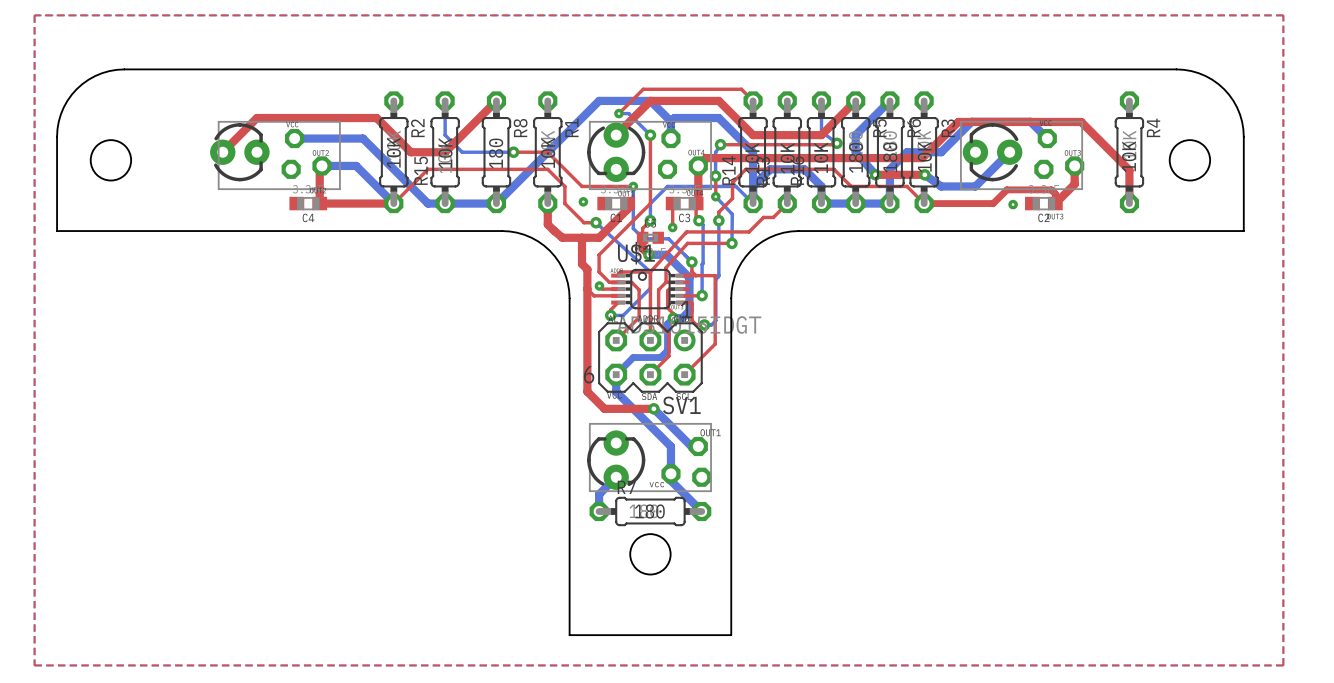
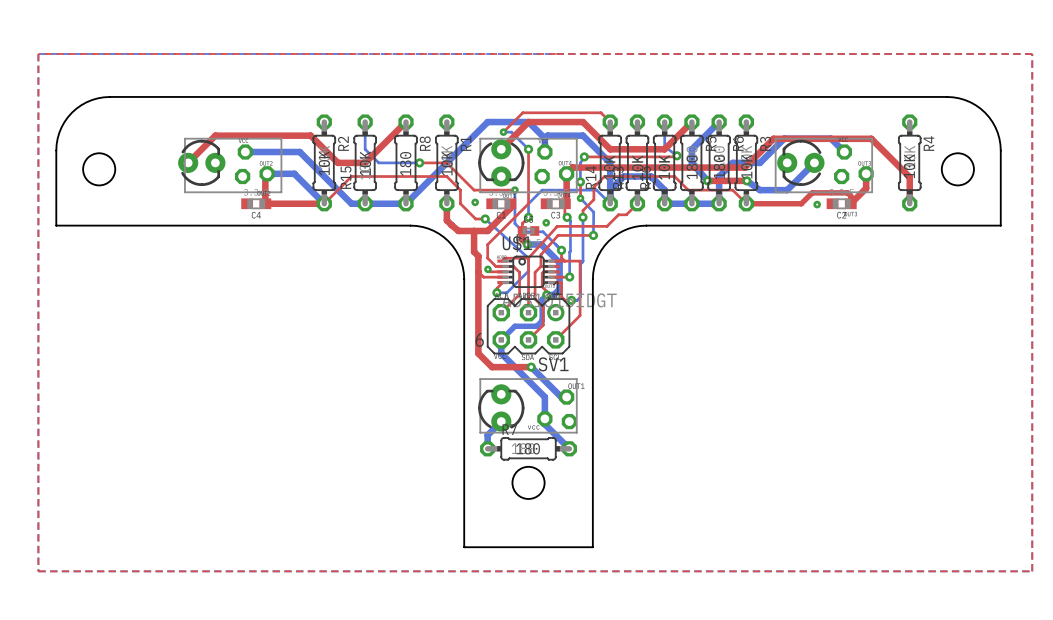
top track: (673, 203) (672, 227) -> none

